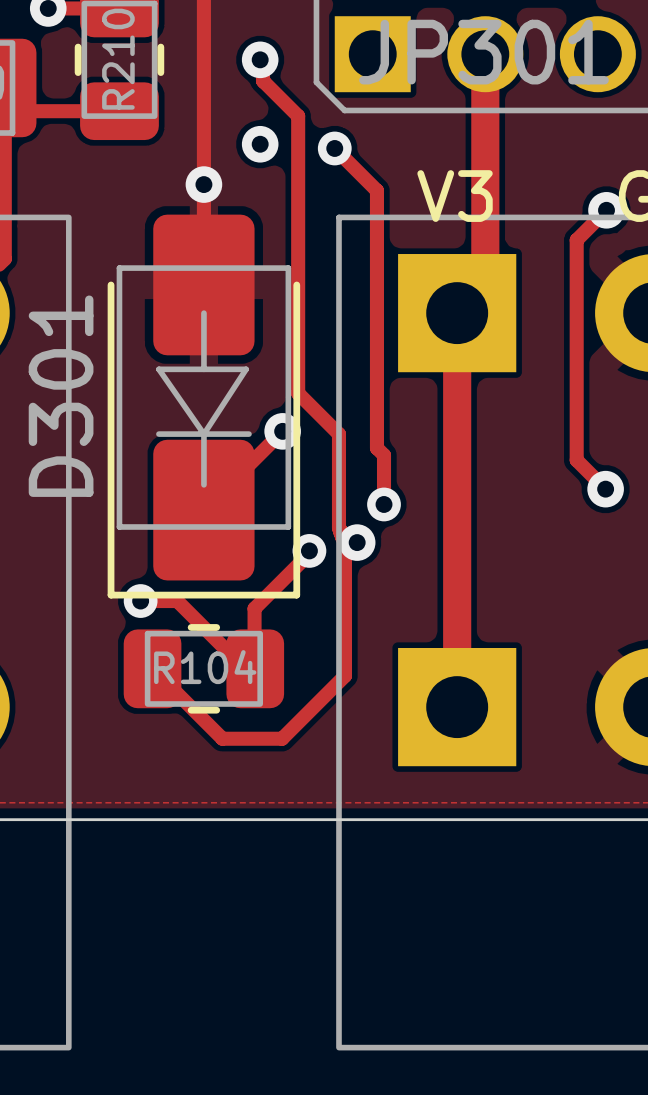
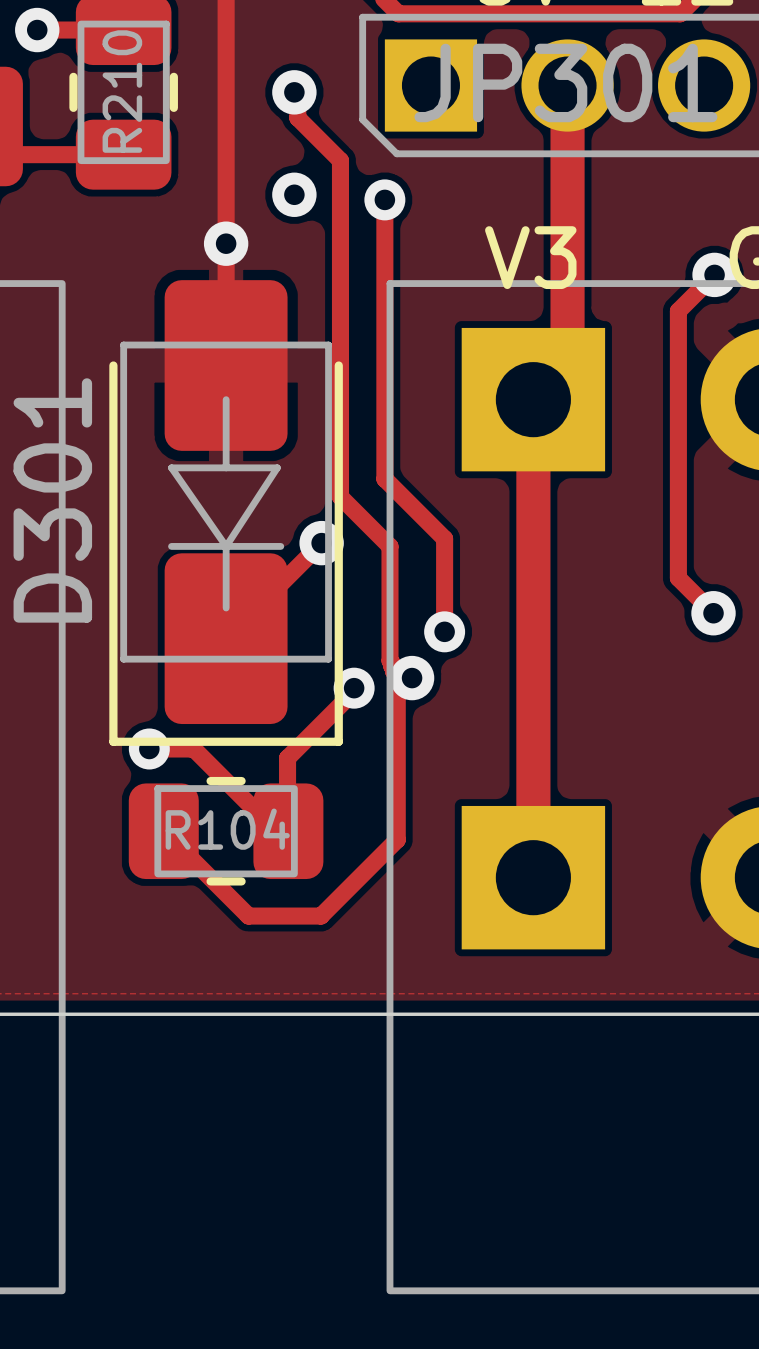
track: (334, 148) (376, 190) (376, 448) (384, 455) -> (384, 199) (384, 479) (444, 538) (444, 572)

